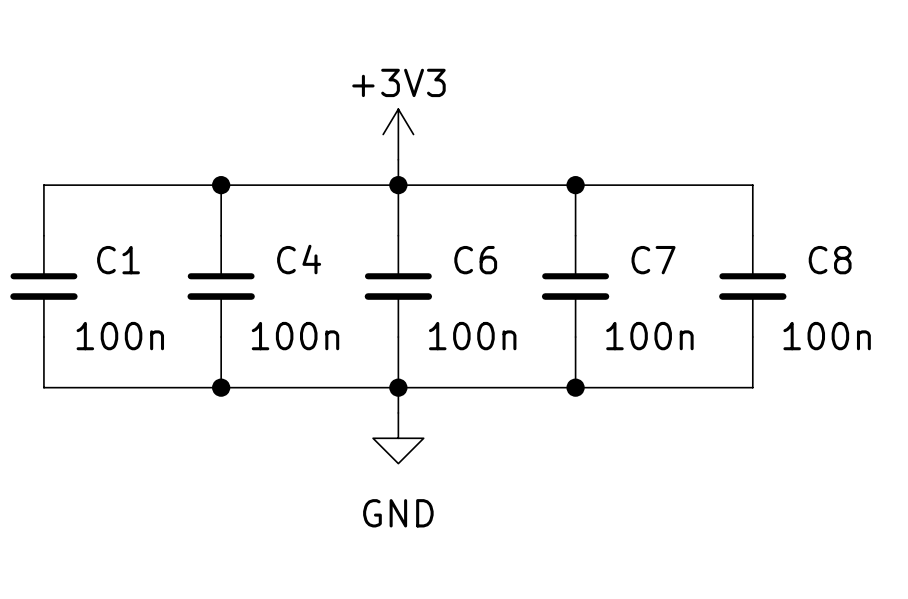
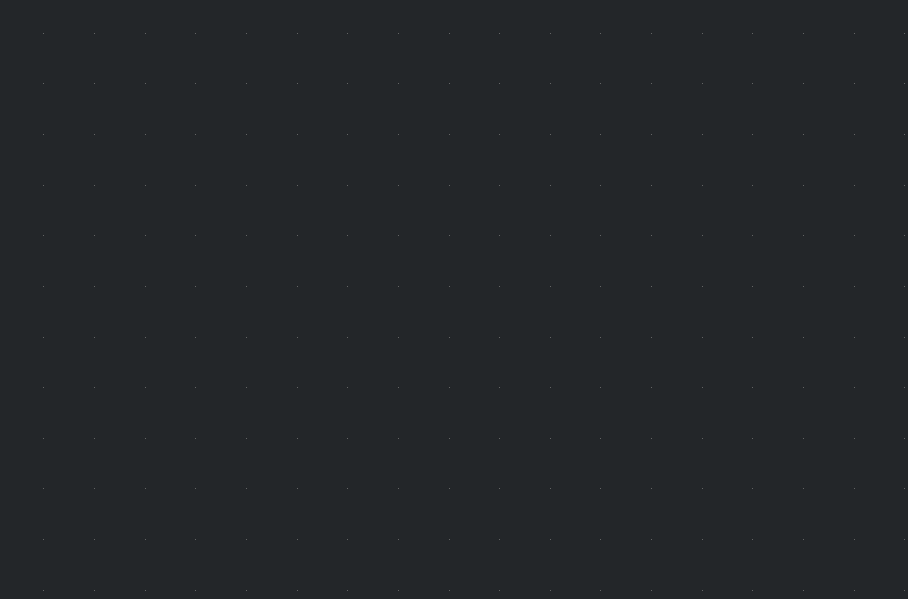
power symbol: +3V3 (398, 134) -> none
wire: (398, 159) (398, 235) -> none
wire: (221, 185) (221, 235) -> none
junction: (221, 185) -> none
junction: (398, 185) -> none
wire: (575, 185) (575, 235) -> none
junction: (575, 185) -> none
wire: (43, 235) (43, 185) (752, 185) (752, 235) -> none
C1: 100n (43, 286) -> none
C4: 100n (221, 286) -> none
C6: 100n (398, 286) -> none
C7: 100n (575, 286) -> none
C8: 100n (752, 286) -> none
wire: (43, 337) (43, 387) (752, 387) (752, 337) -> none
wire: (221, 337) (221, 387) -> none
wire: (398, 337) (398, 412) -> none
wire: (575, 337) (575, 387) -> none
junction: (221, 387) -> none
junction: (398, 387) -> none
junction: (575, 387) -> none
power symbol: GND (398, 438) -> none

